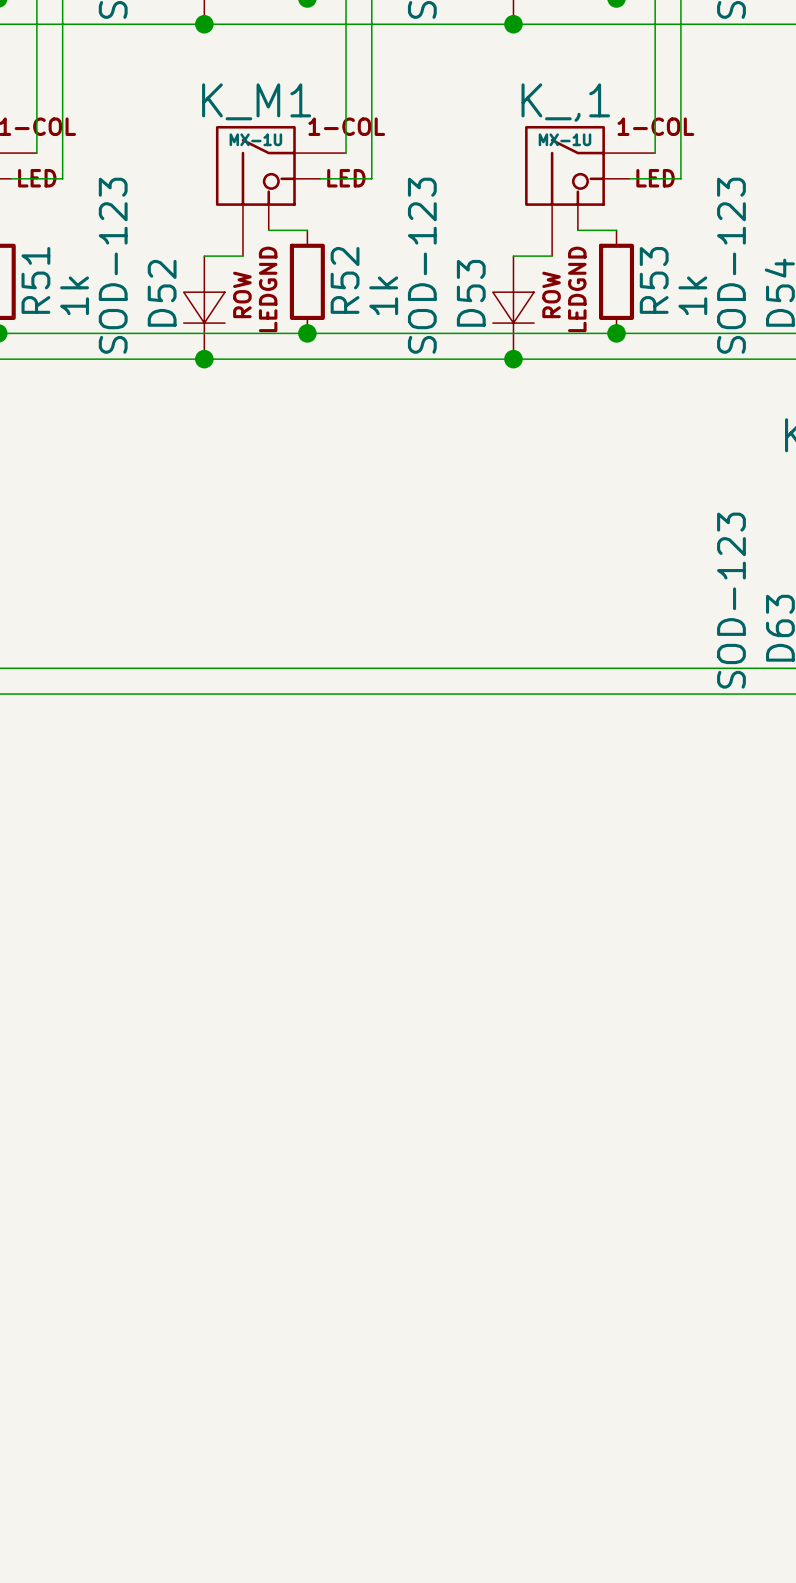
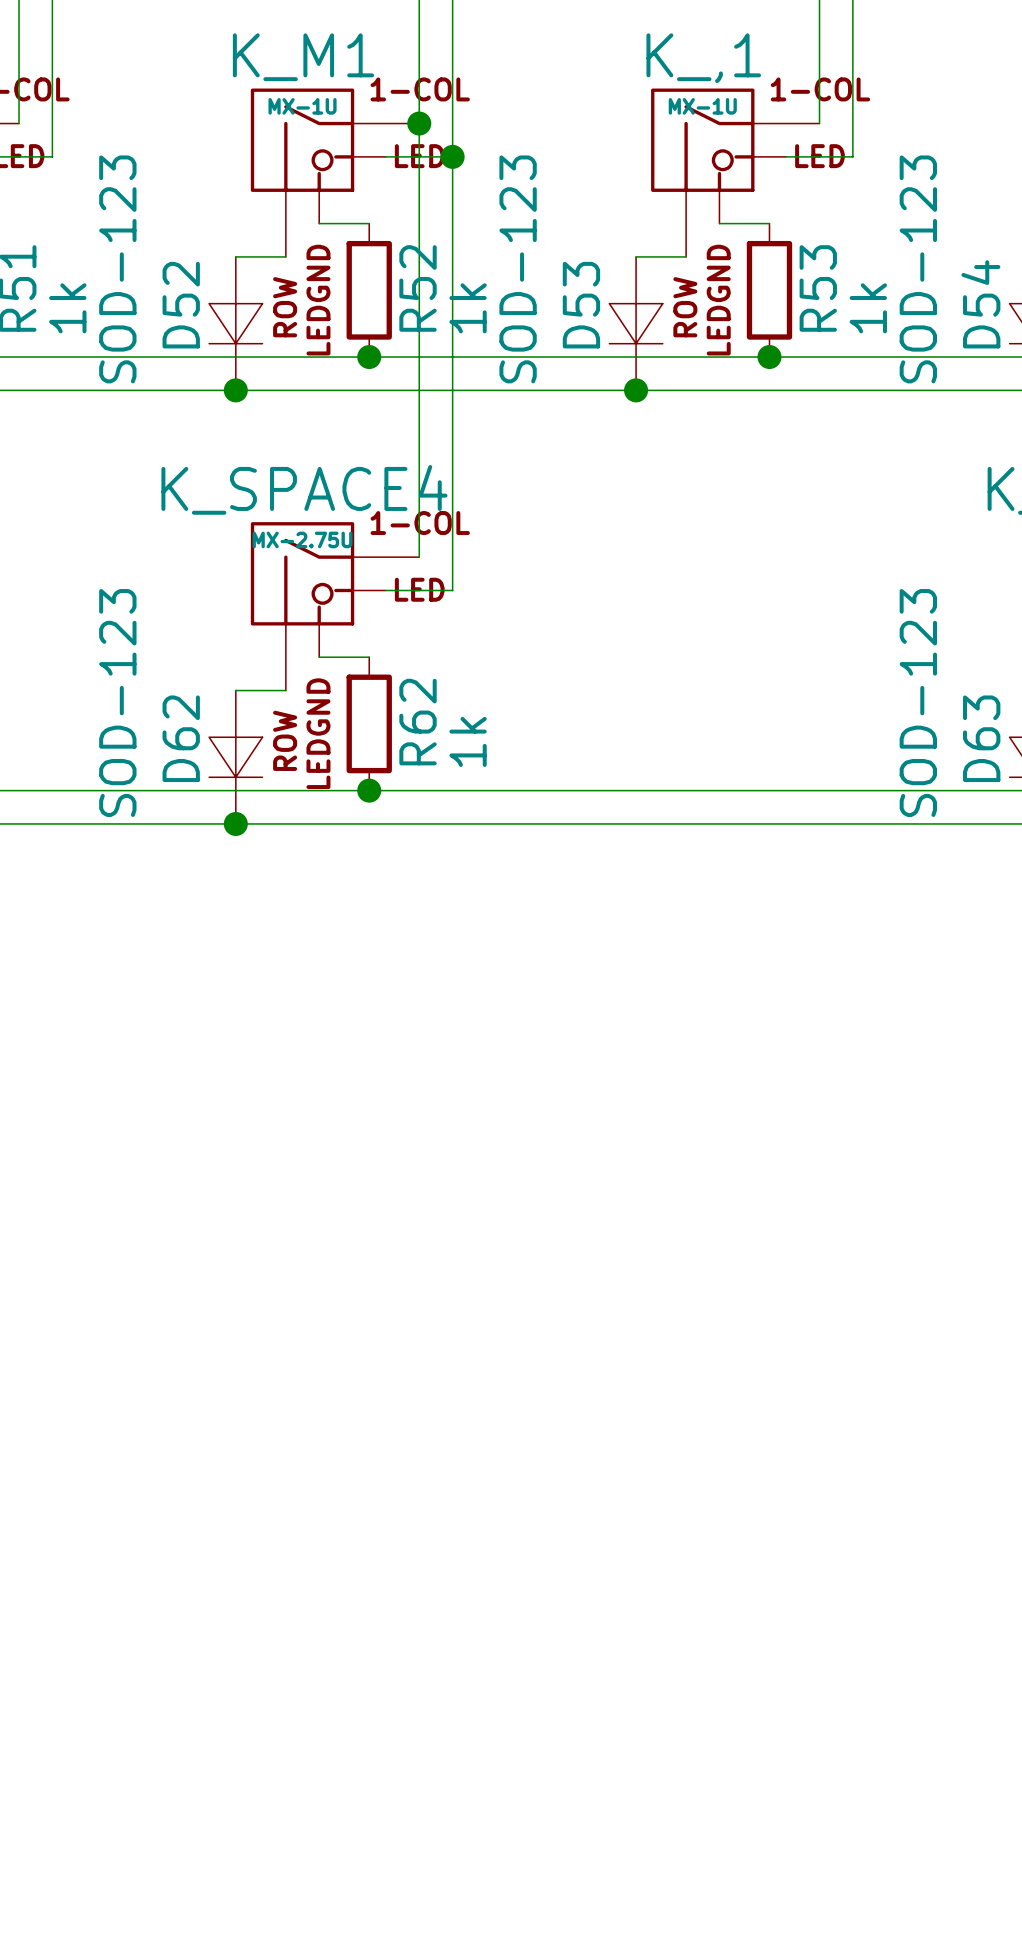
wire: none -> (419, 123) (419, 557)
junction: none -> (419, 123)
wire: none -> (452, 156) (452, 590) (385, 590)
junction: none -> (452, 156)
K_SPACE4: none -> MX-2.75U (335, 606)
wire: none -> (319, 657) (369, 657)
wire: none -> (235, 690) (285, 690)
R62: none -> 1k (369, 723)
D62: none -> SOD-123 (235, 757)
junction: none -> (369, 790)
junction: none -> (235, 823)

